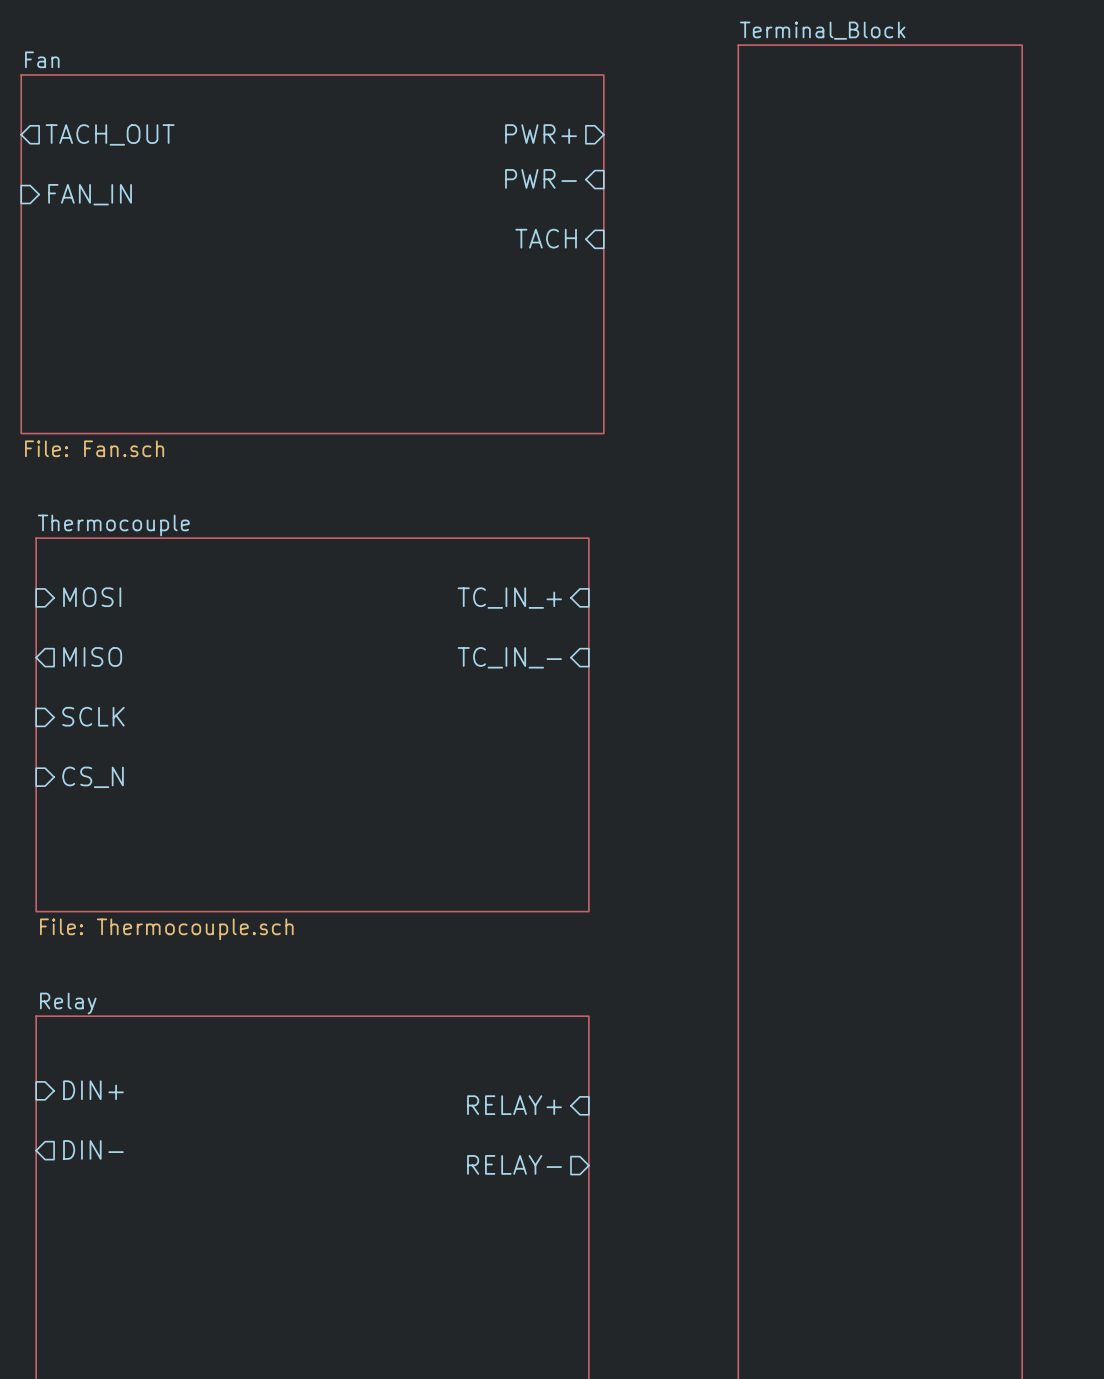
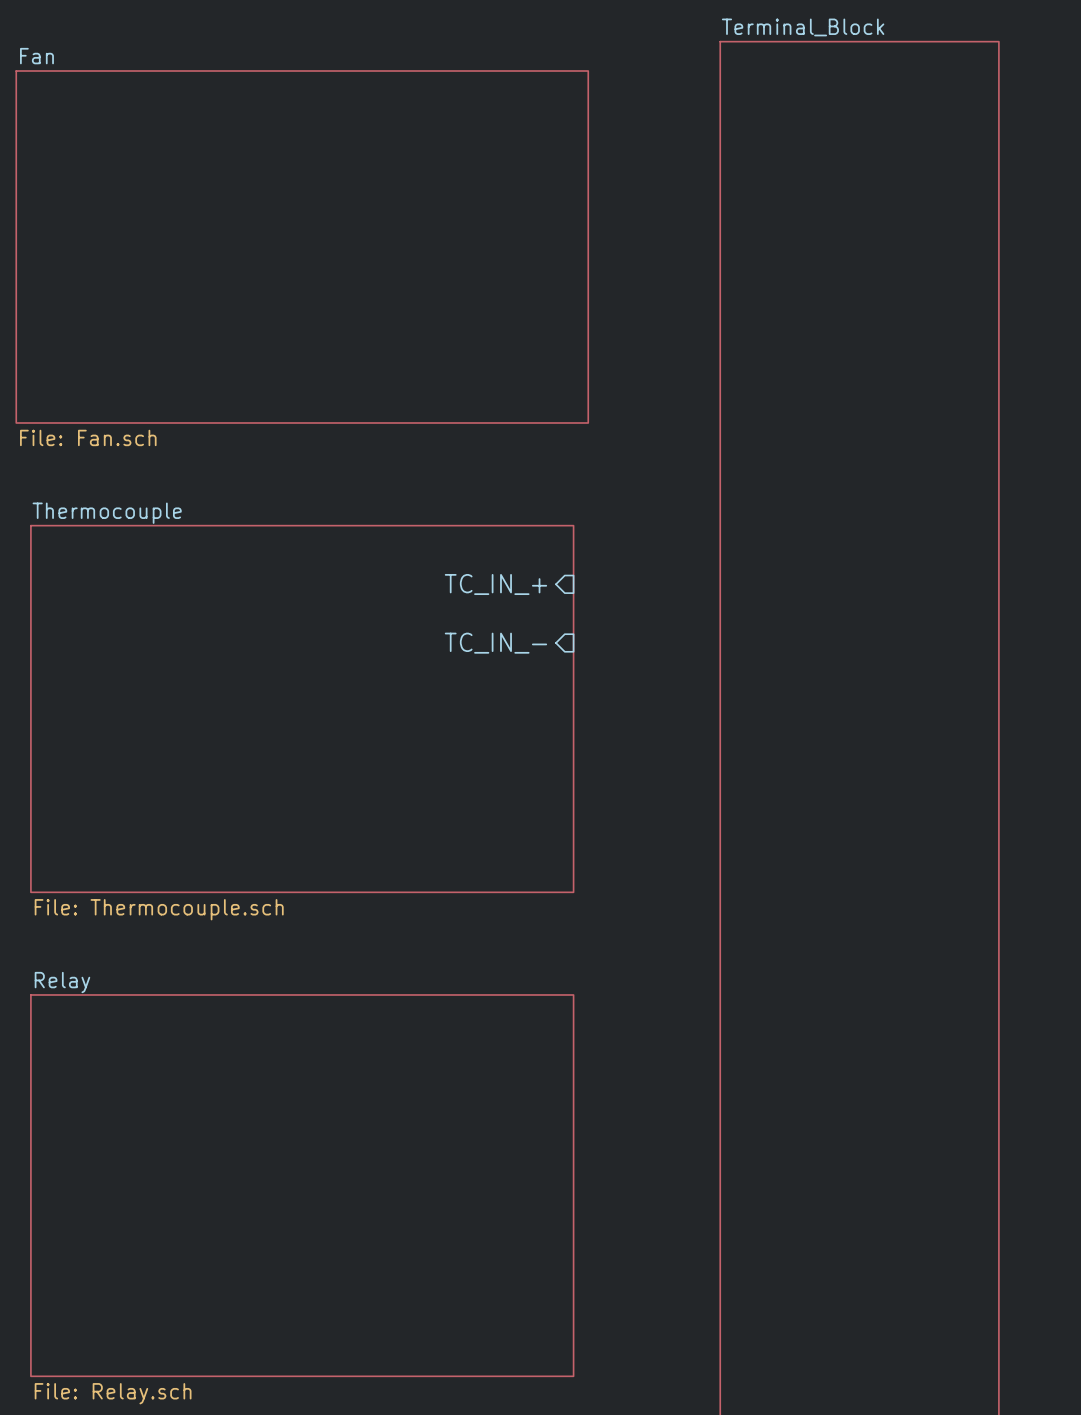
sheet pin: TACH_OUT (110, 134) -> none
sheet pin: PWR+ (540, 134) -> none
sheet pin: PWR- (540, 178) -> none
sheet pin: FAN_IN (90, 194) -> none
sheet pin: TACH (546, 238) -> none
sheet pin: MOSI (92, 597) -> none
sheet pin: MISO (92, 656) -> none
sheet pin: SCLK (93, 716) -> none
sheet pin: CS_N (93, 777) -> none
sheet pin: DIN+ (93, 1090) -> none
sheet pin: RELAY+ (514, 1105) -> none
sheet pin: DIN- (93, 1149) -> none
sheet pin: RELAY- (514, 1164) -> none

